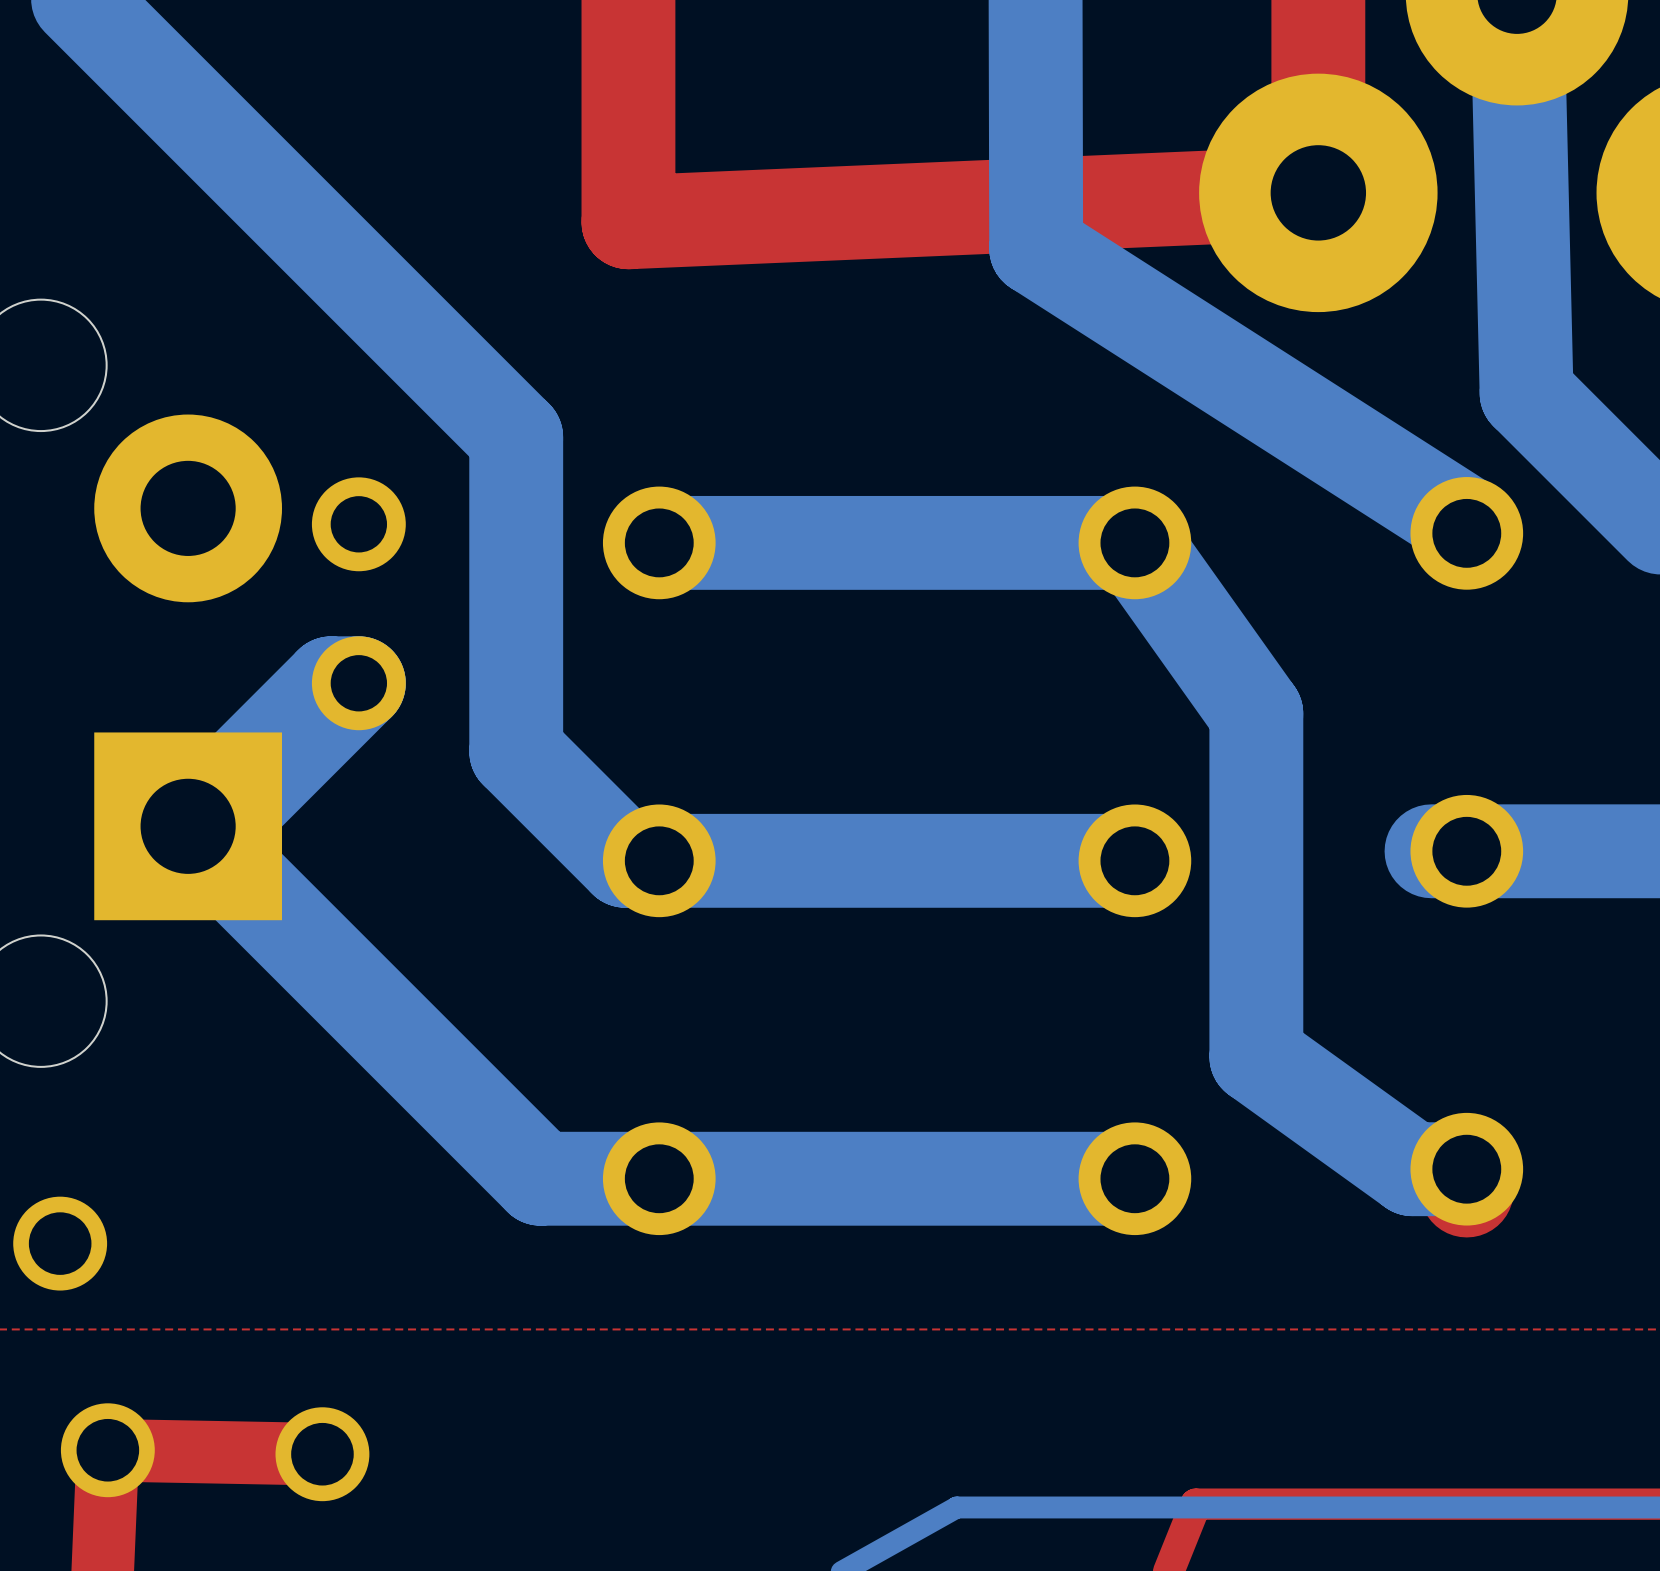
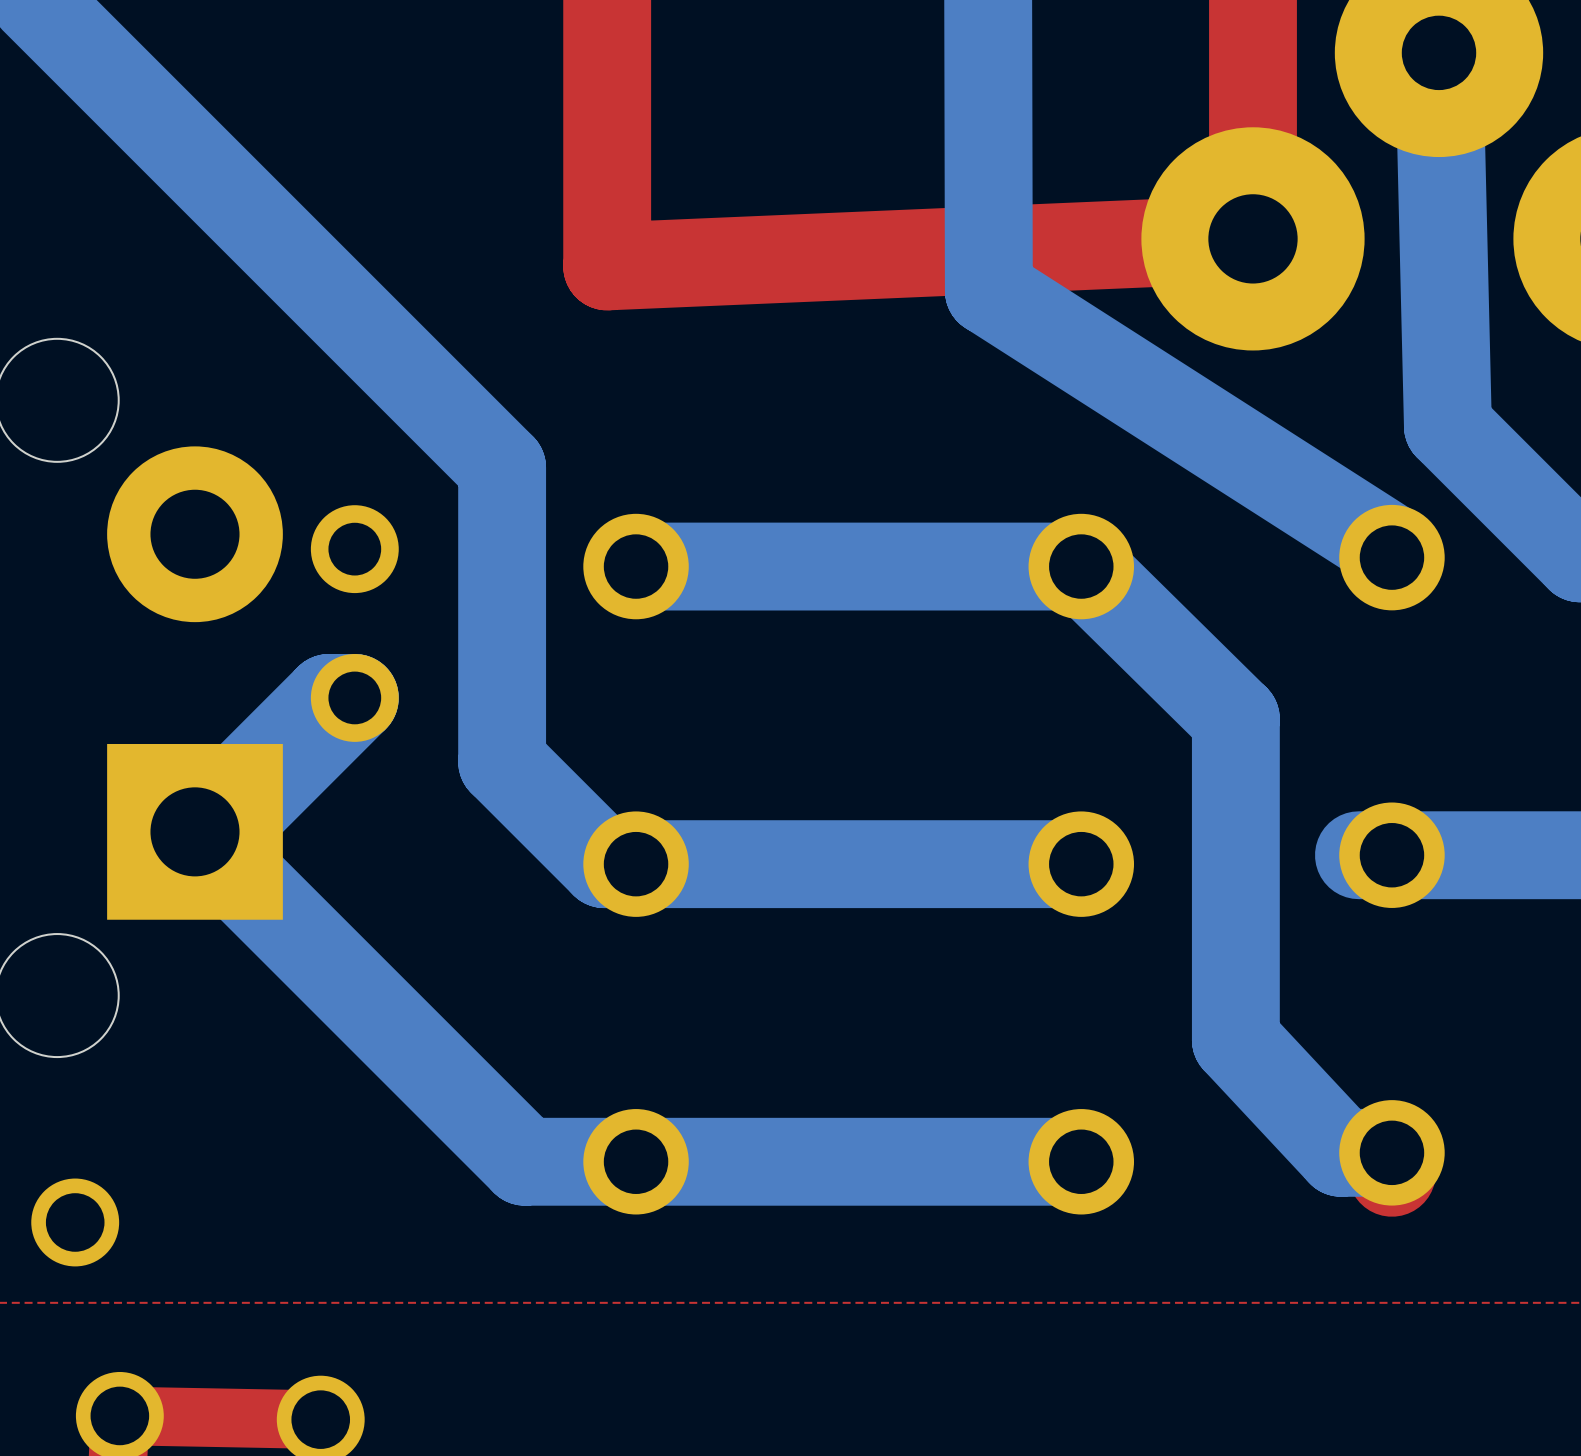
bottom track: (1134, 542) (1256, 713) (1256, 1056) (1412, 1169) -> (1081, 566) (1235, 718) (1235, 1040) (1341, 1152)

